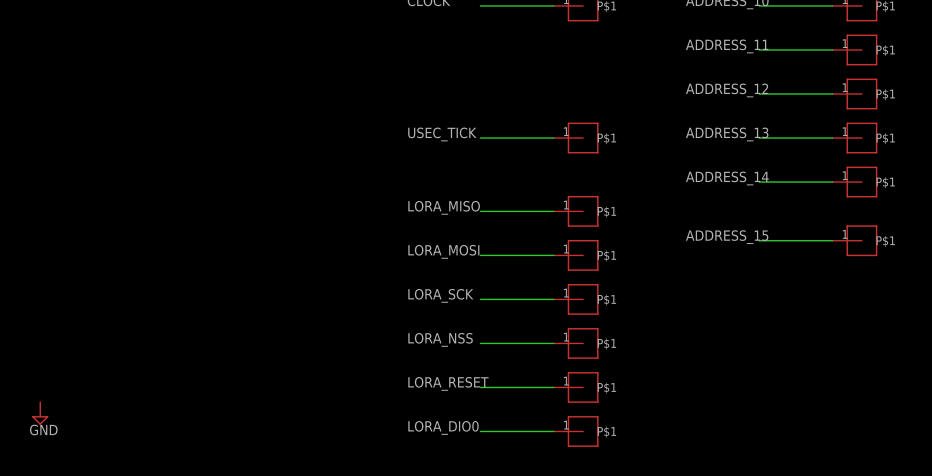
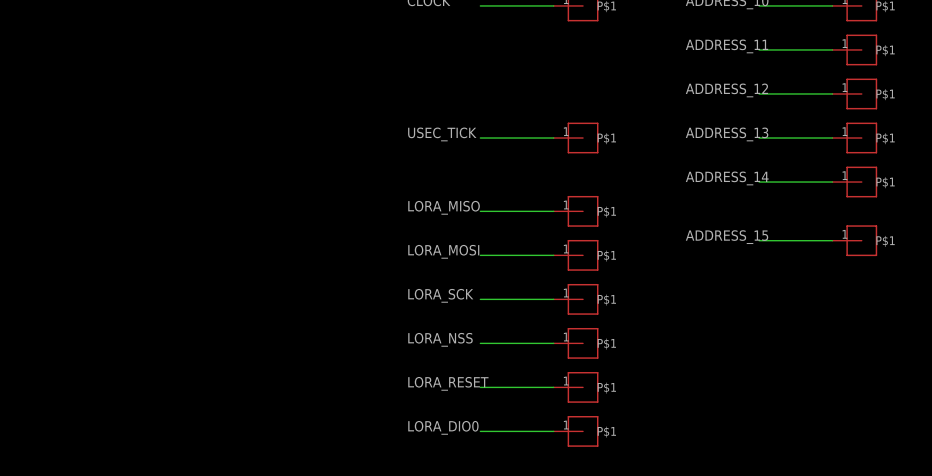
power symbol: GND (40, 413) -> none

